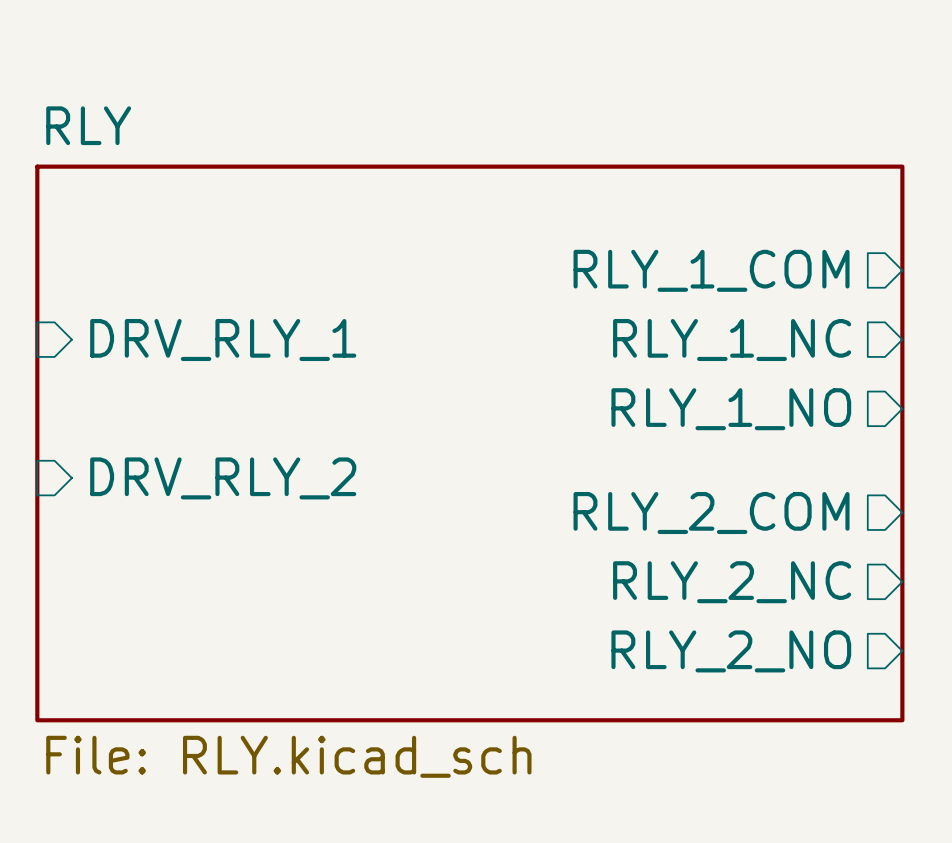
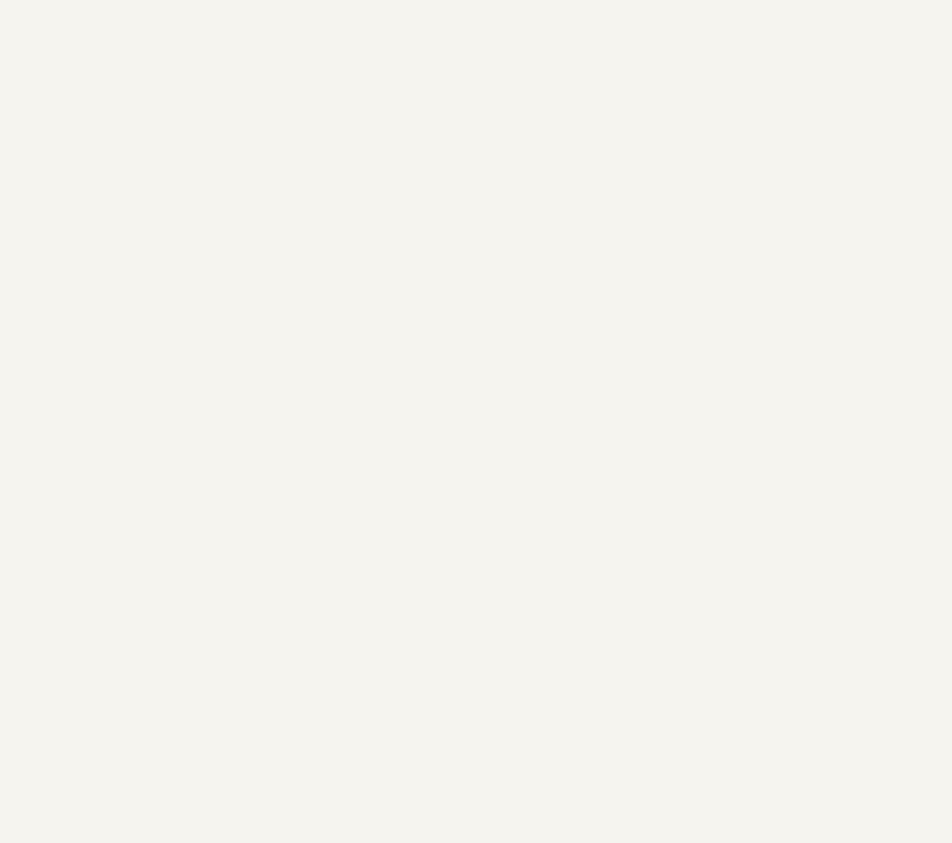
sheet pin: RLY_1_COM (711, 270) -> none
sheet pin: DRV_RLY_1 (223, 340) -> none
sheet pin: RLY_1_NC (732, 340) -> none
sheet pin: RLY_1_NO (731, 409) -> none
sheet RLY: File: RLY.kicad_sch (469, 443) -> none
sheet pin: DRV_RLY_2 (223, 478) -> none
sheet pin: RLY_2_COM (711, 513) -> none
sheet pin: RLY_2_NC (732, 582) -> none
sheet pin: RLY_2_NO (731, 651) -> none

